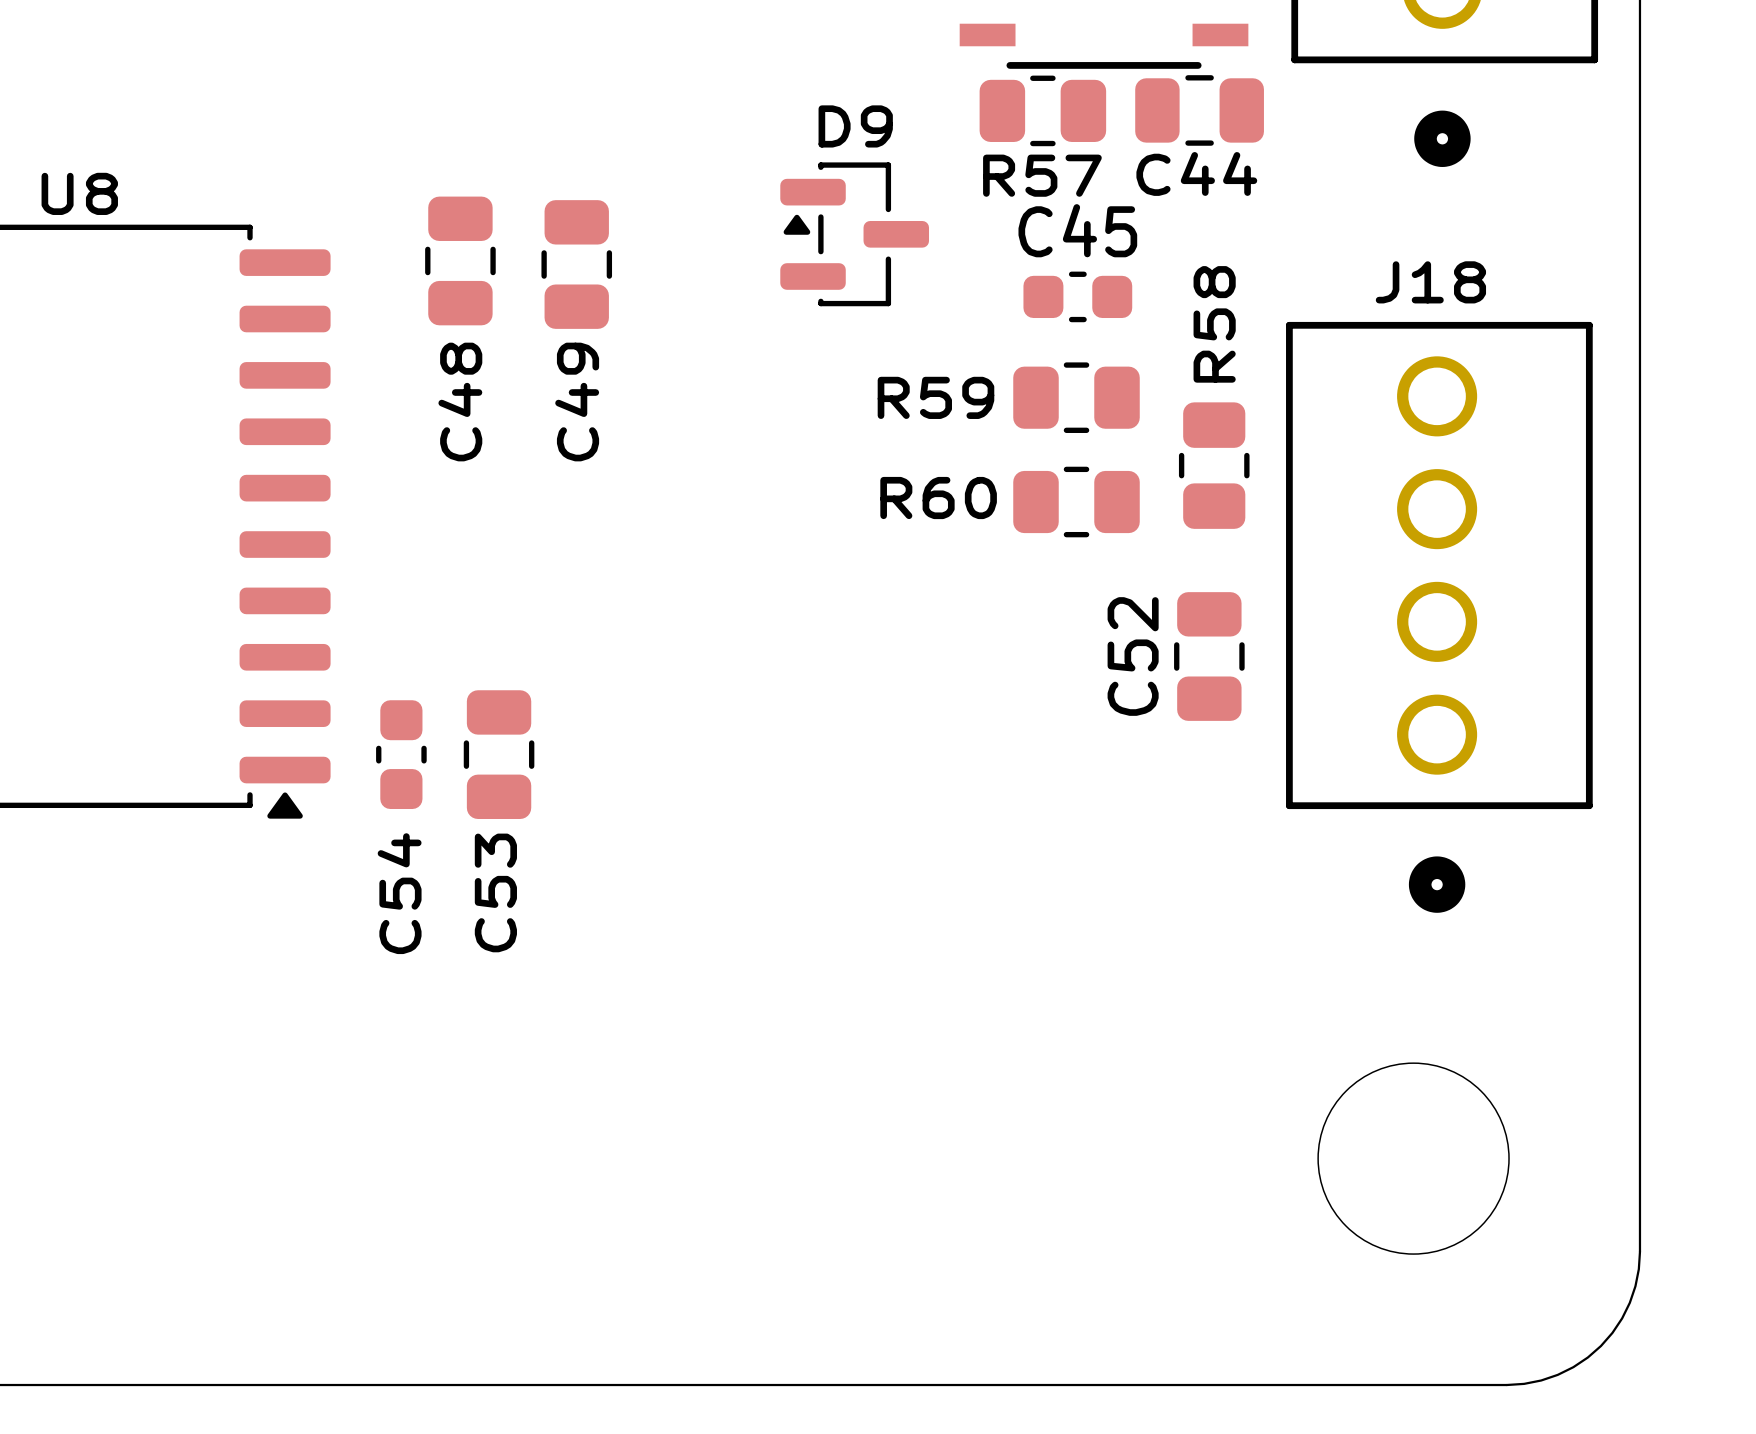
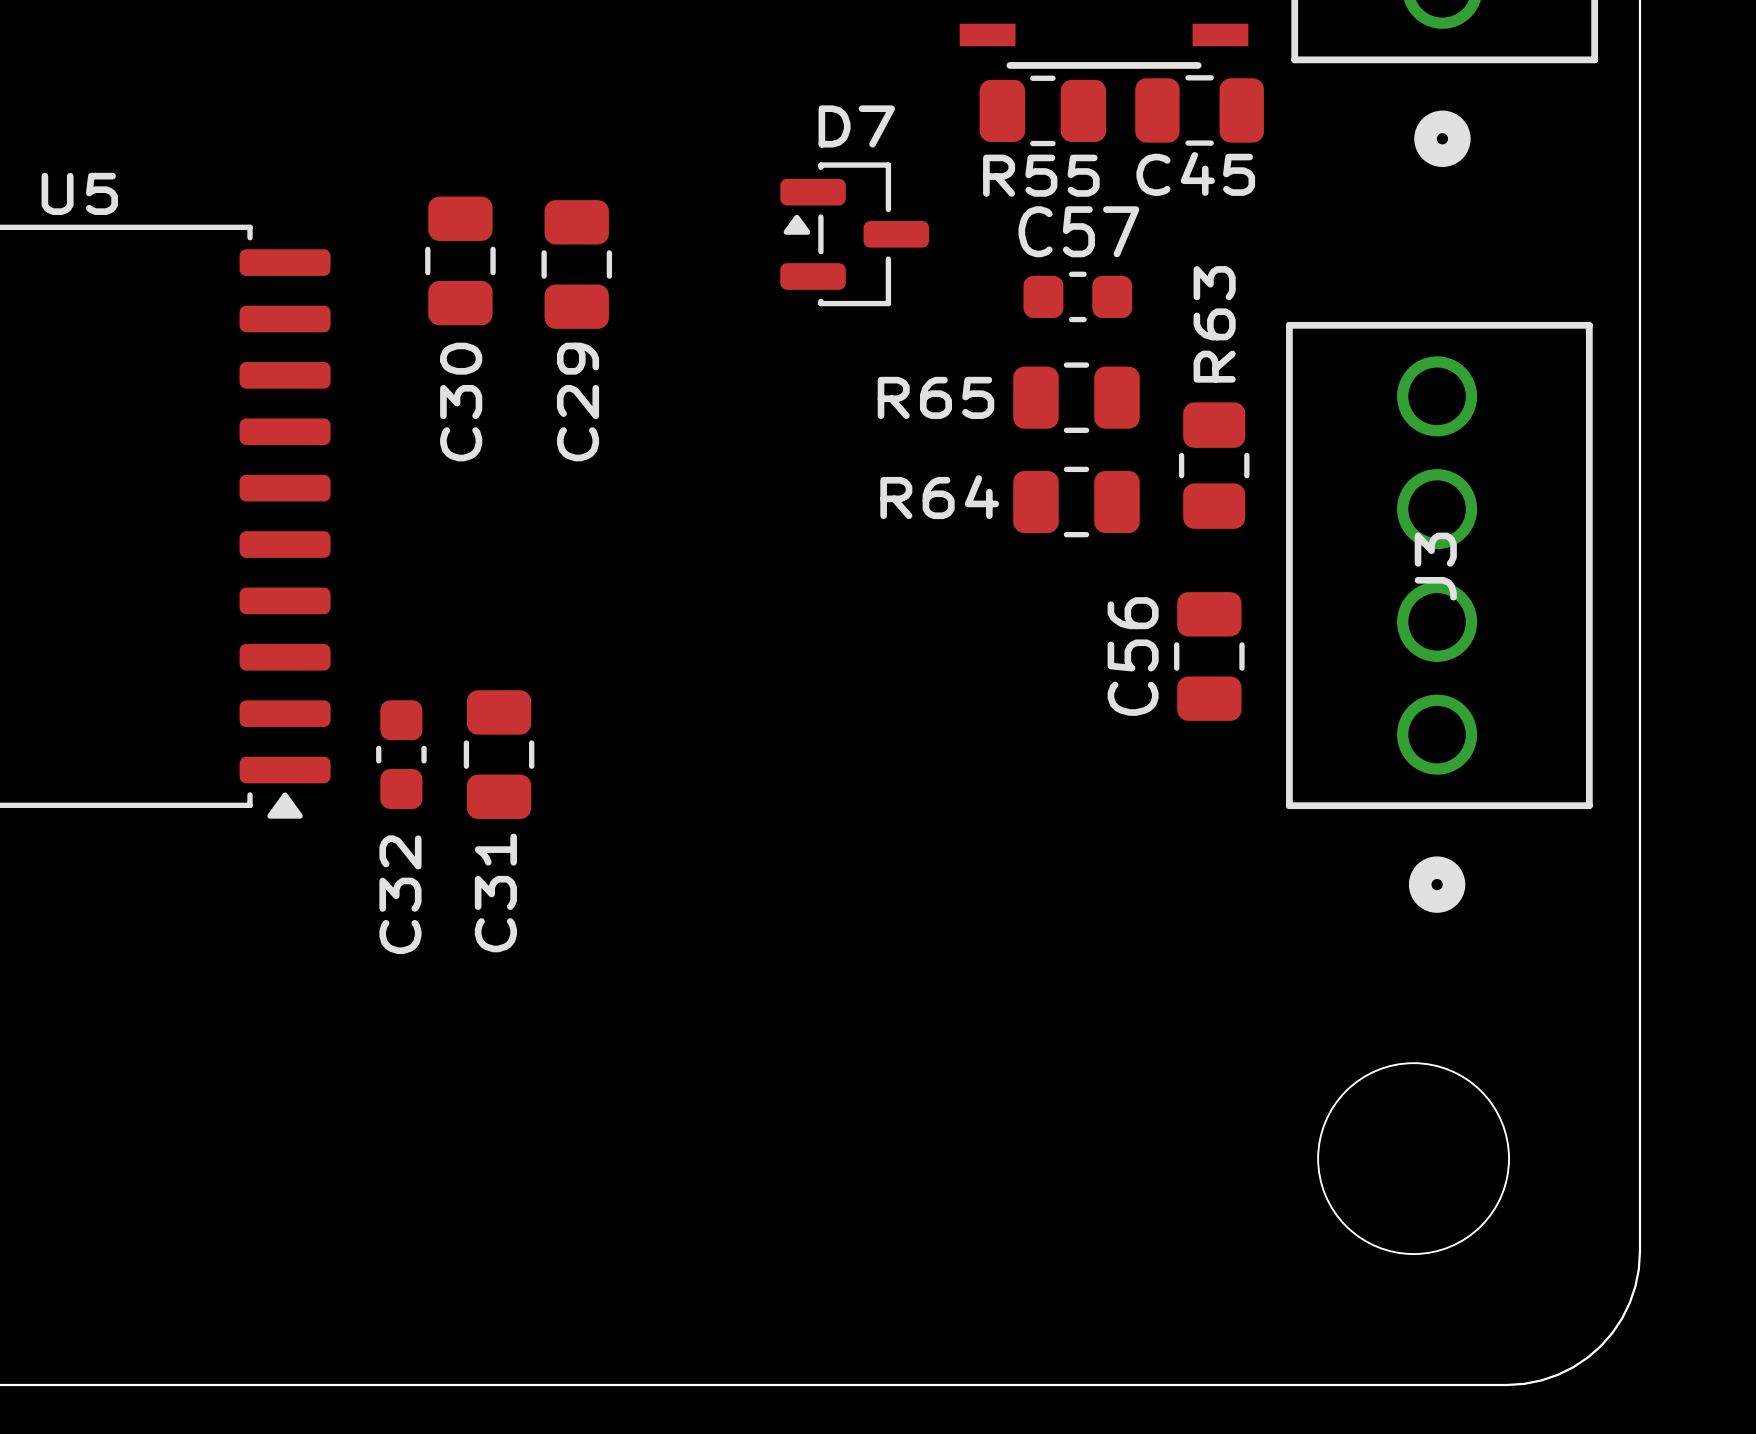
D9 name: D9 (855, 126) -> D7 (856, 126)
C44 name: C44 (1196, 173) -> C45 (1195, 173)
R57 name: R57 (1042, 175) -> R55 (1041, 175)
U8 name: U8 (79, 193) -> U5 (79, 193)
C45 name: C45 (1077, 230) -> C57 (1078, 231)
J18 name: J18 (1430, 282) -> J3 (1435, 566)
R58 name: R58 (1214, 324) -> R63 (1214, 324)
R59 name: R59 (935, 397) -> R65 (935, 397)
C48 name: C48 (460, 402) -> C30 (461, 402)
C49 name: C49 (577, 402) -> C29 (578, 402)
R60 name: R60 (938, 498) -> R64 (939, 497)
C52 name: C52 (1133, 656) -> C56 (1133, 656)
C53 name: C53 (495, 892) -> C31 (495, 892)
C54 name: C54 (399, 893) -> C32 (400, 894)

